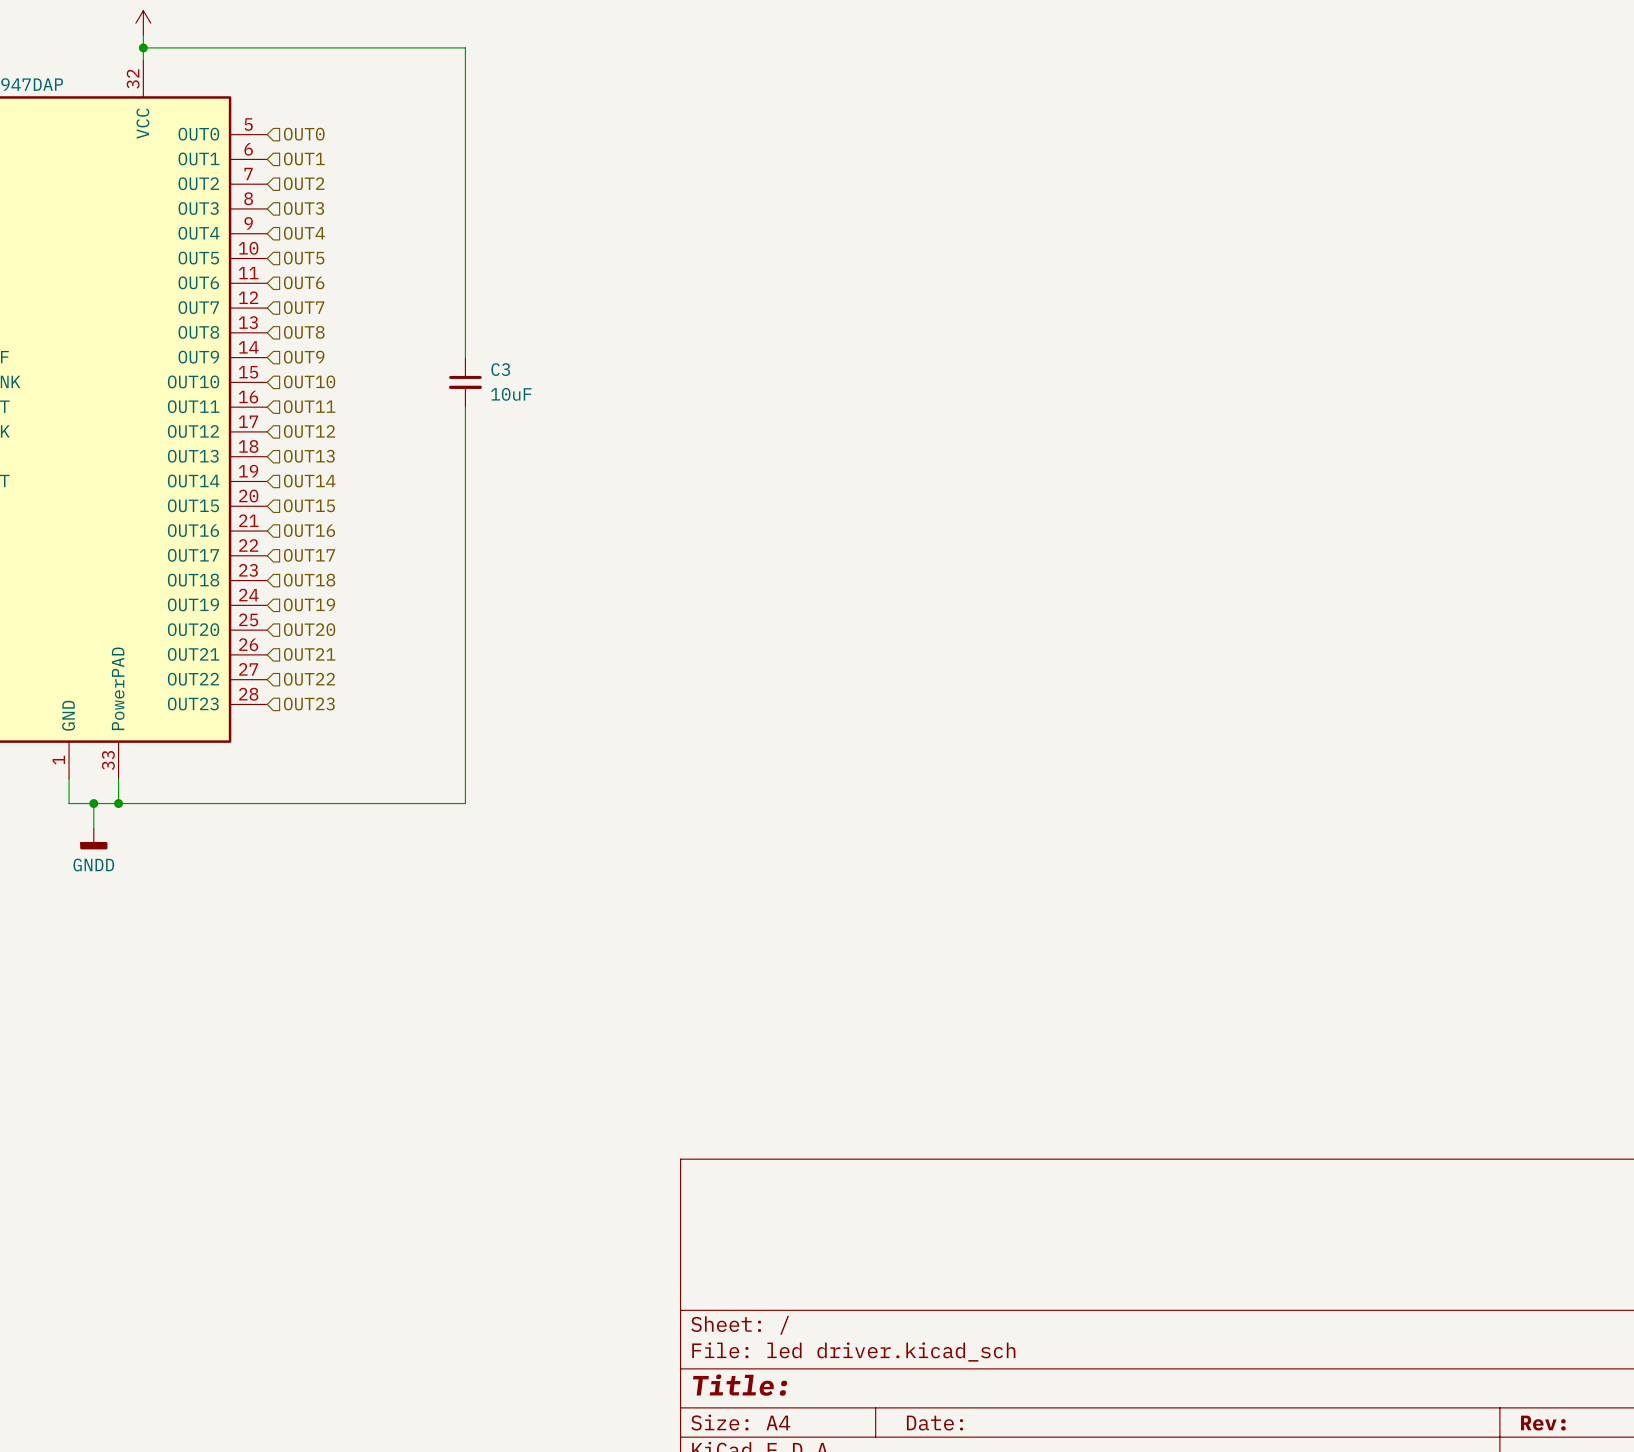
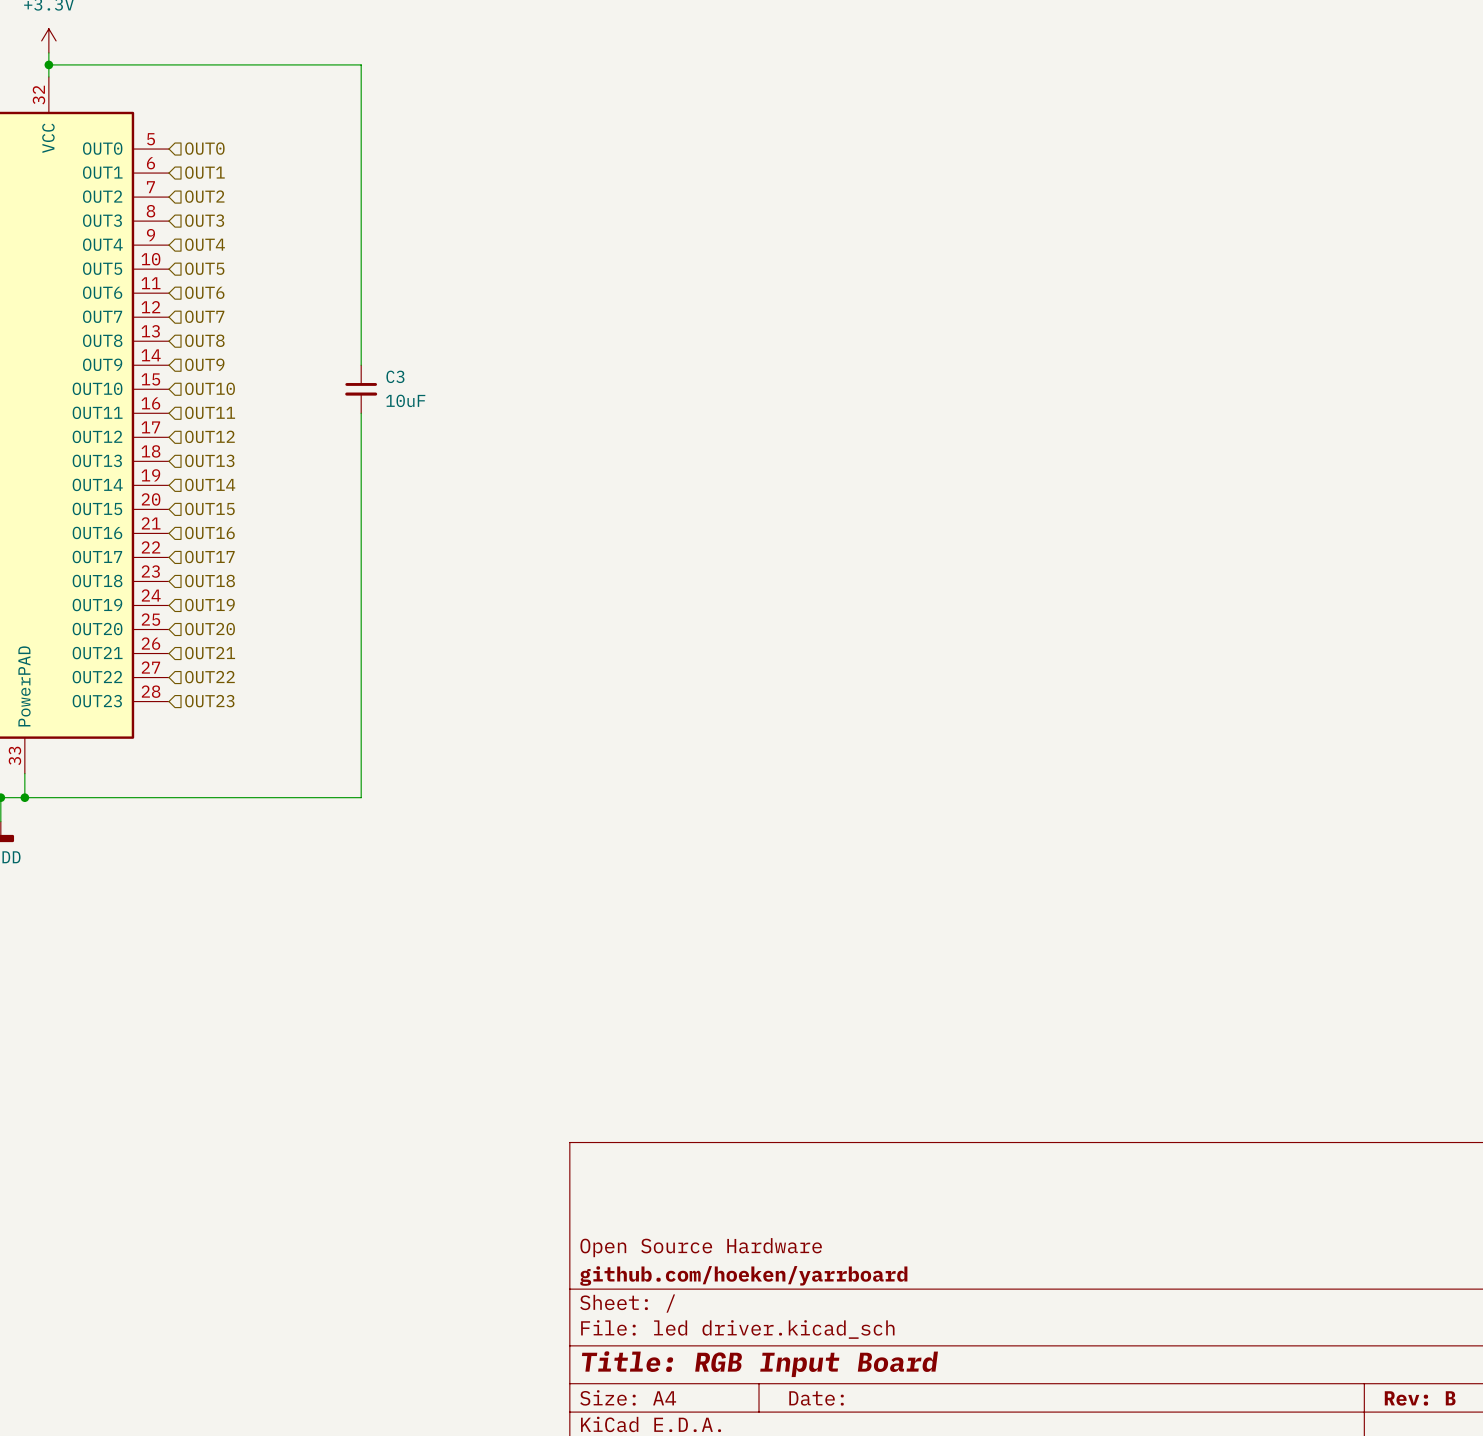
title block: none -> Open Source Hardware (701, 1247)
title block: none -> github.com/hoeken/yarrboard (743, 1275)
title block: Title: (740, 1385) -> Title: RGB Input Board (759, 1364)
title block: Rev: (1543, 1423) -> Rev: B (1420, 1398)

